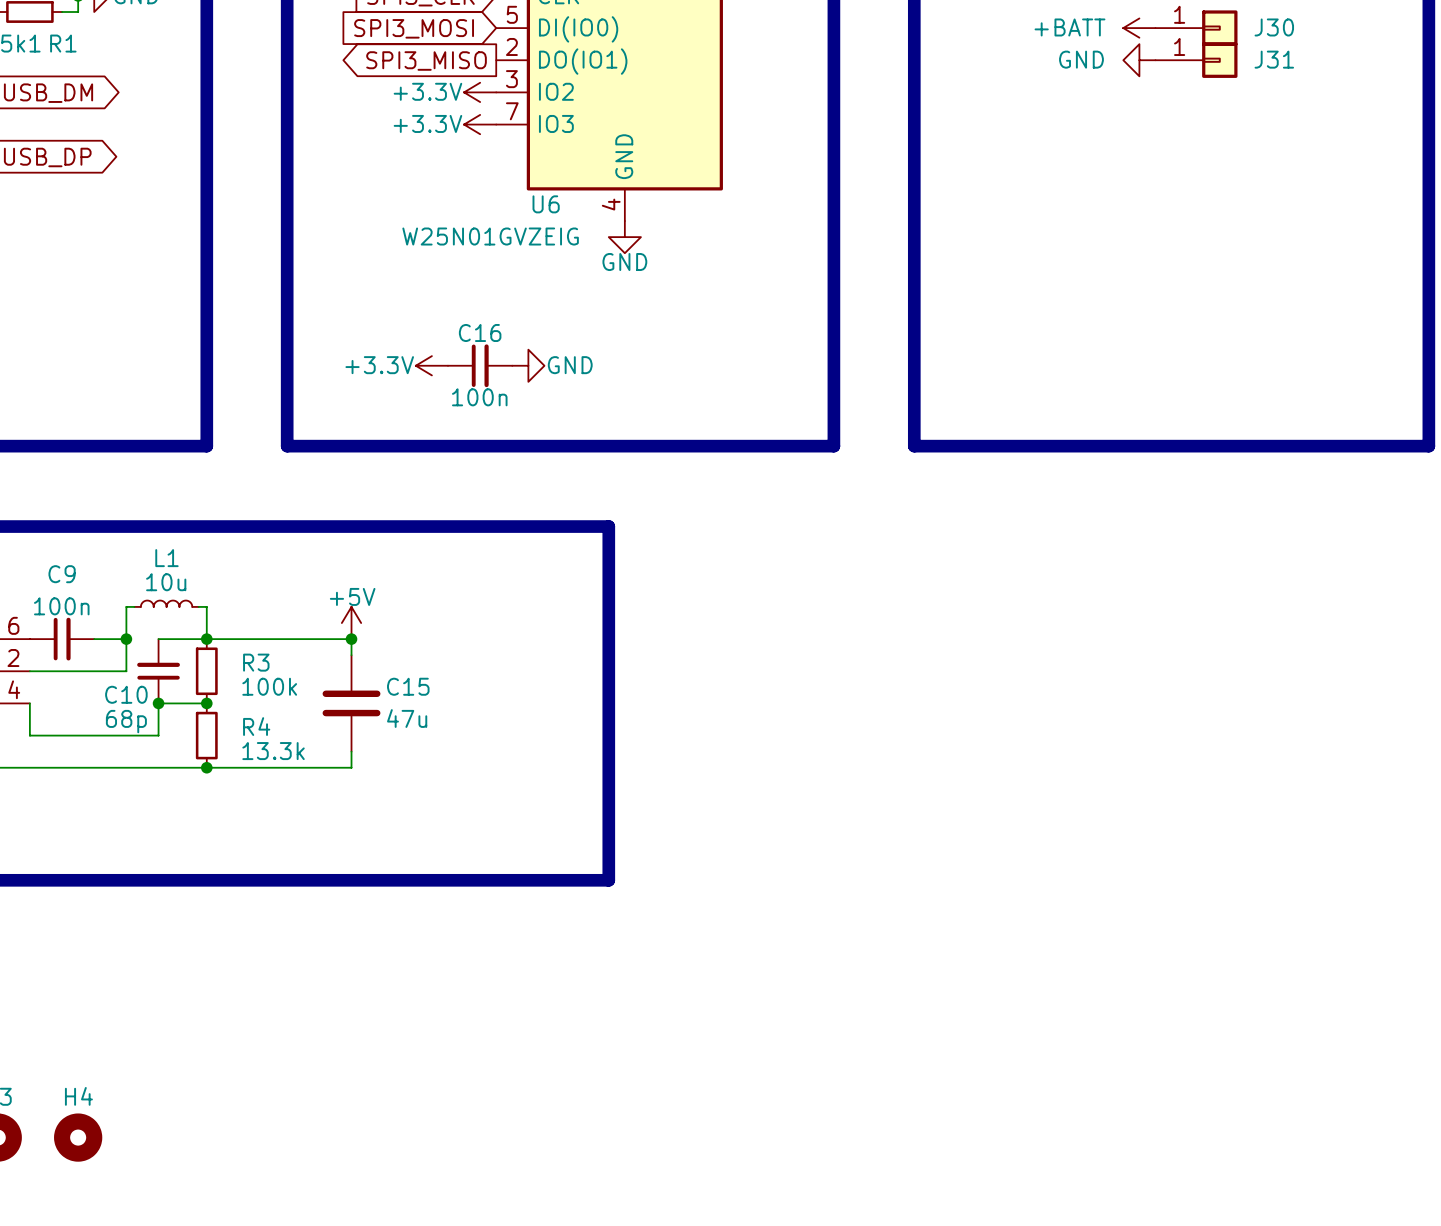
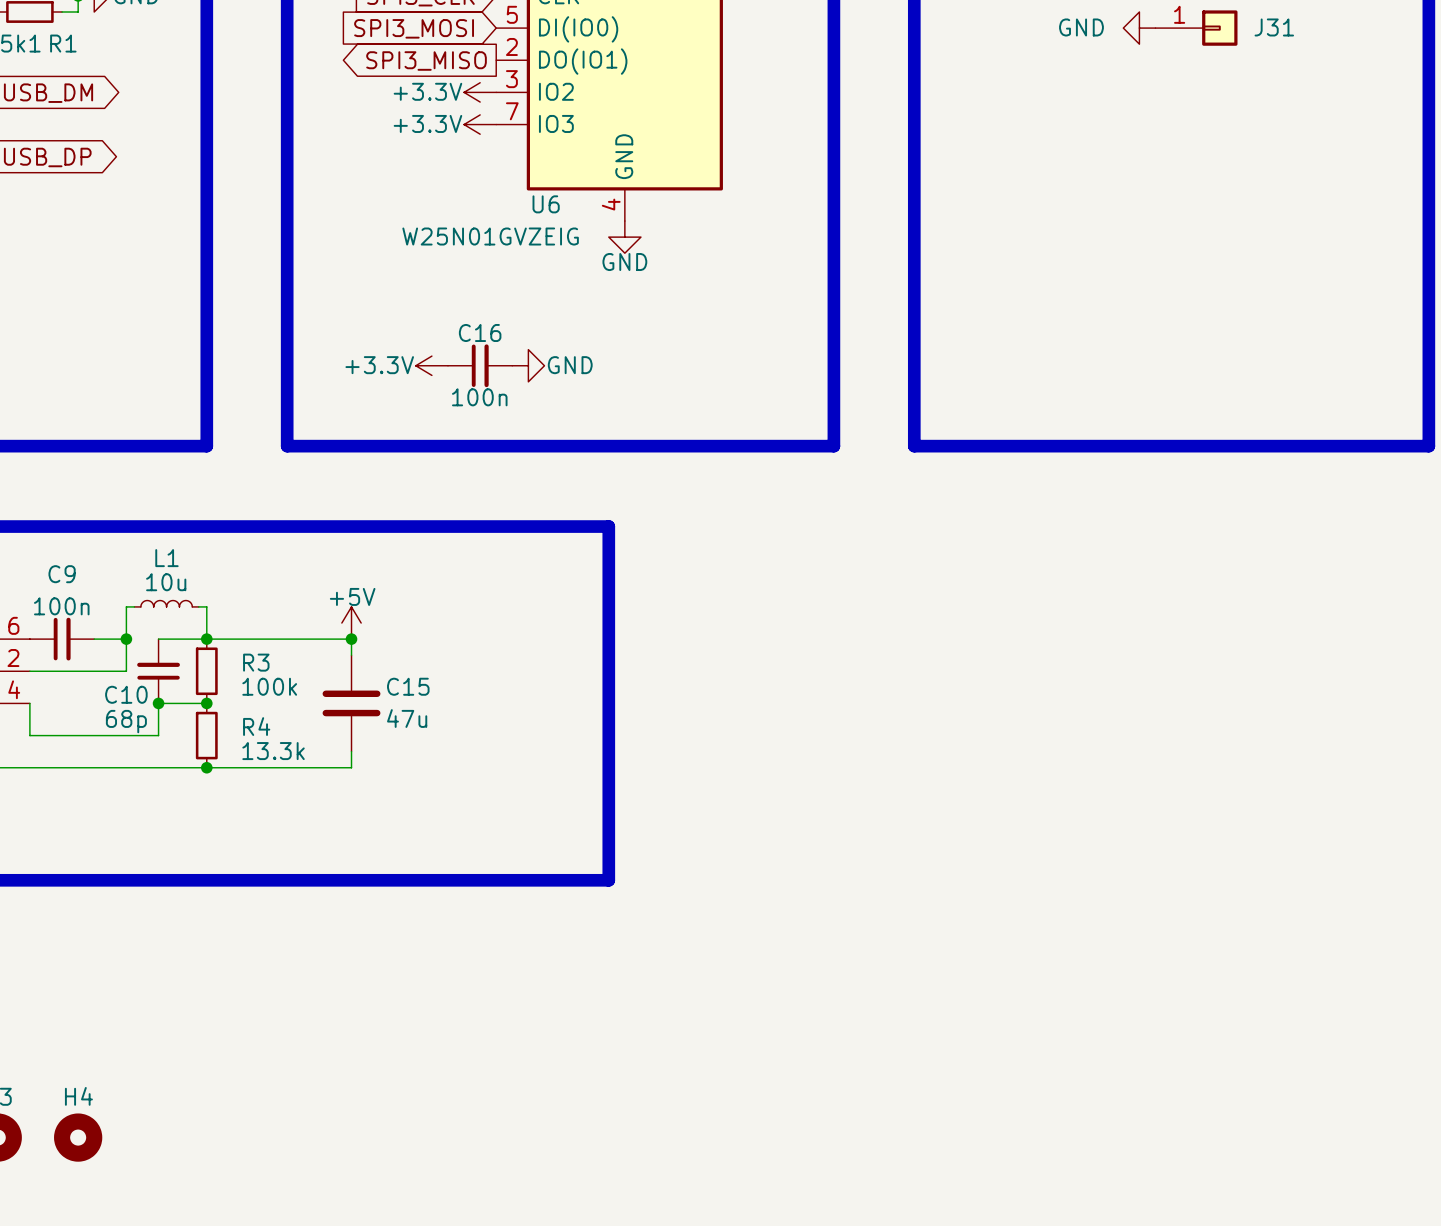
J30 name: J30 (1274, 27) -> J31 (1274, 27)
power symbol: +BATT (1139, 28) -> GND (1139, 28)
power symbol: GND (1139, 60) -> none
J31: (1196, 60) -> none

